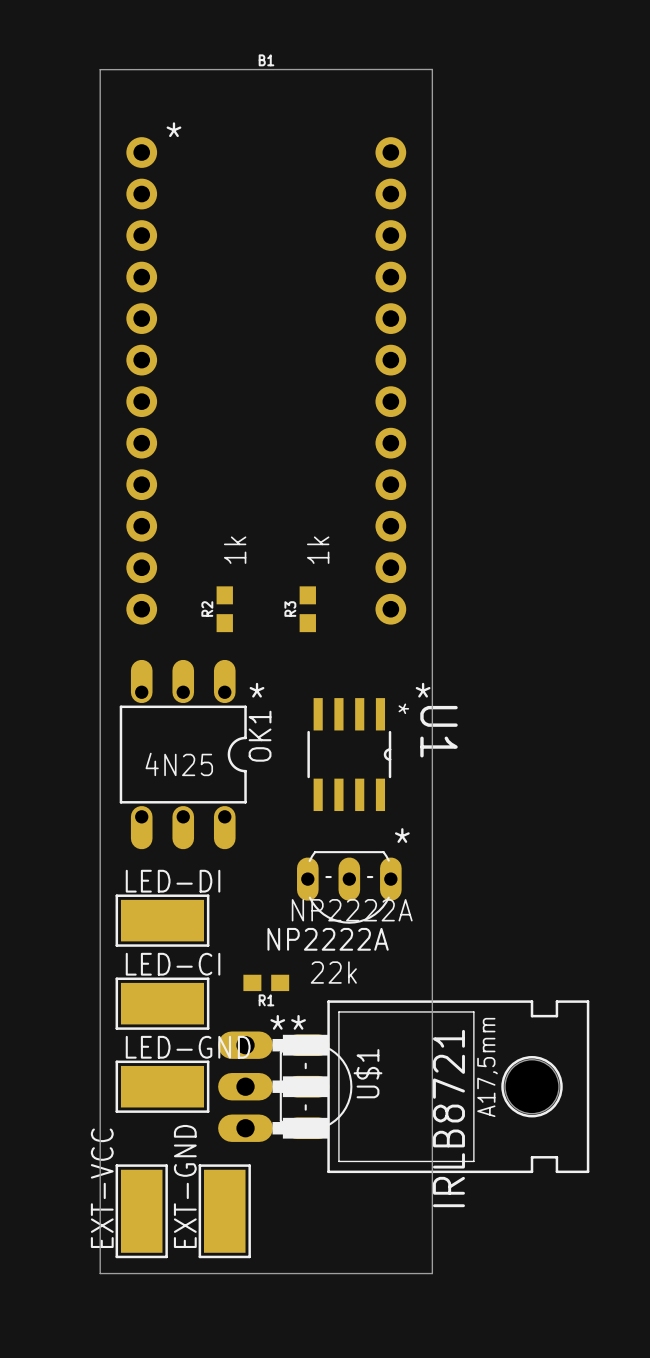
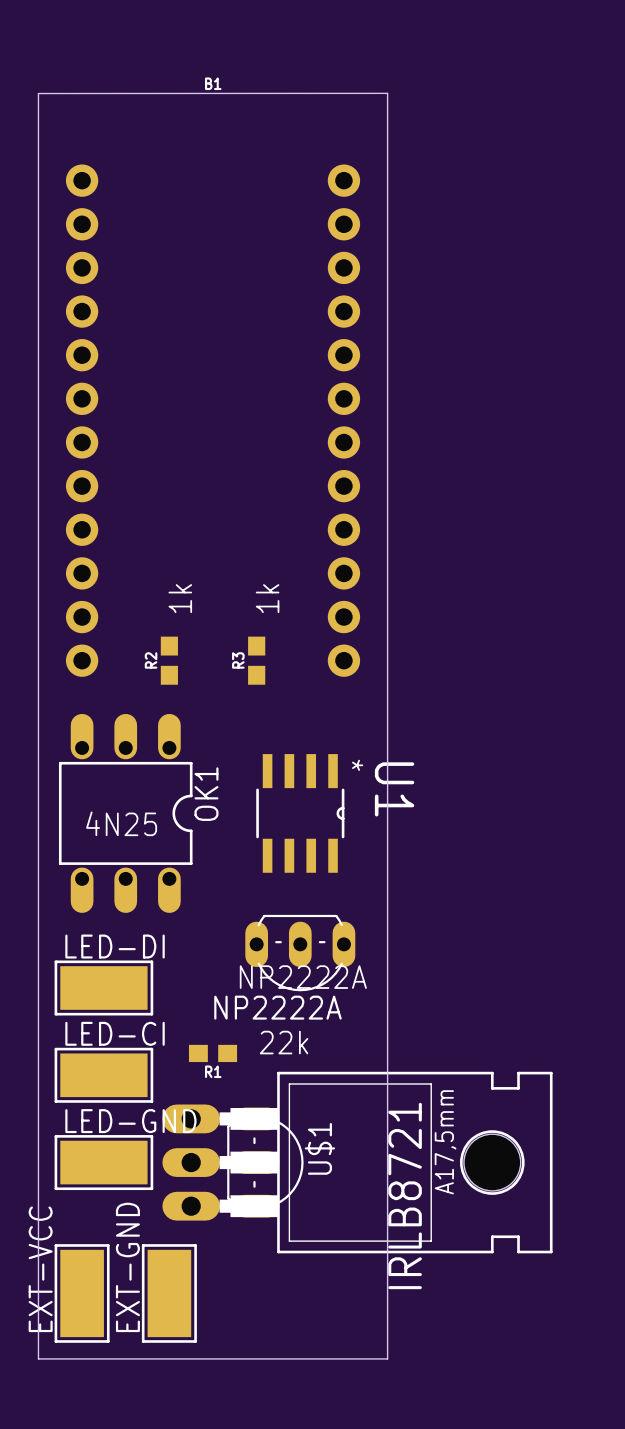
text: * (173, 129) -> none
text: * (257, 690) -> none
text: * (423, 690) -> none
text: * (402, 835) -> none
text: * (277, 1022) -> none
text: * (298, 1022) -> none

